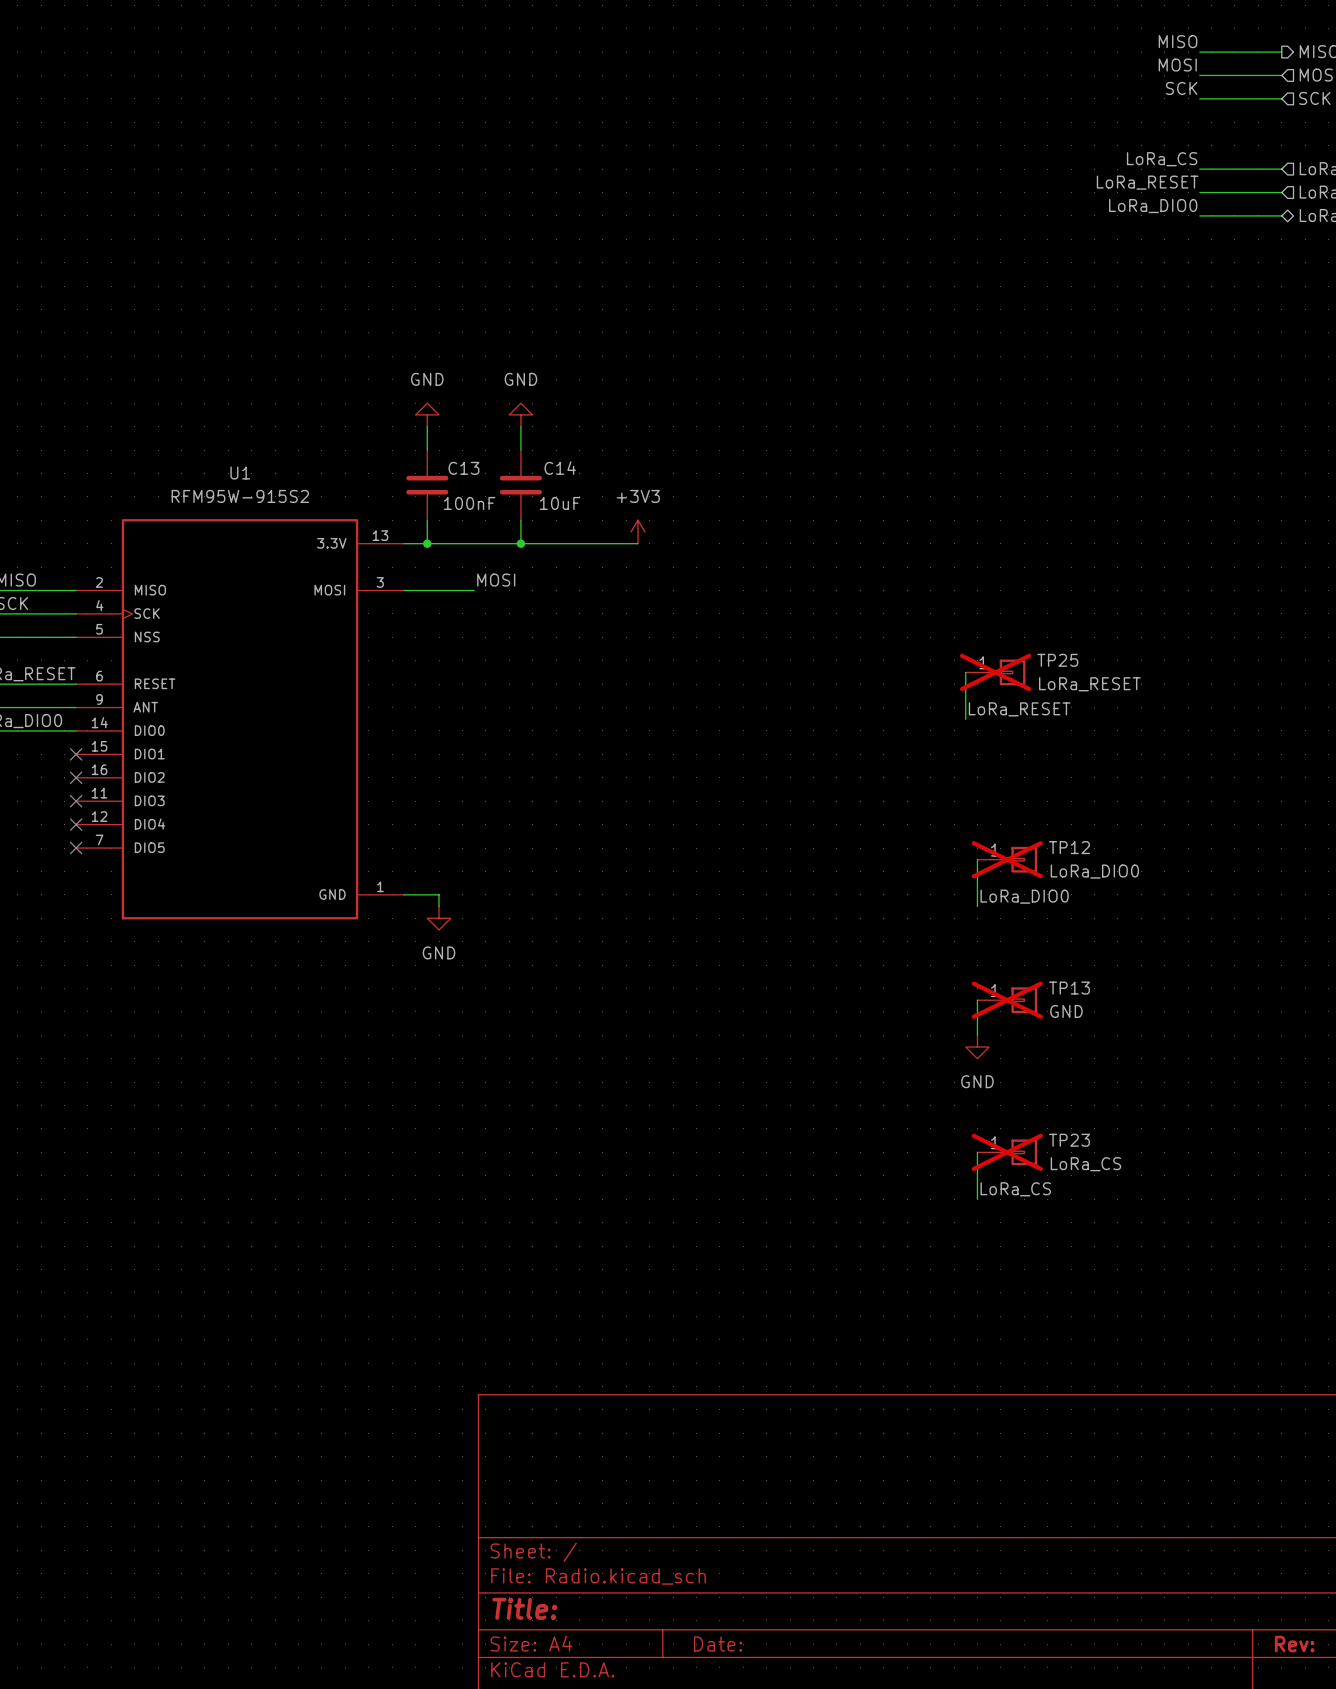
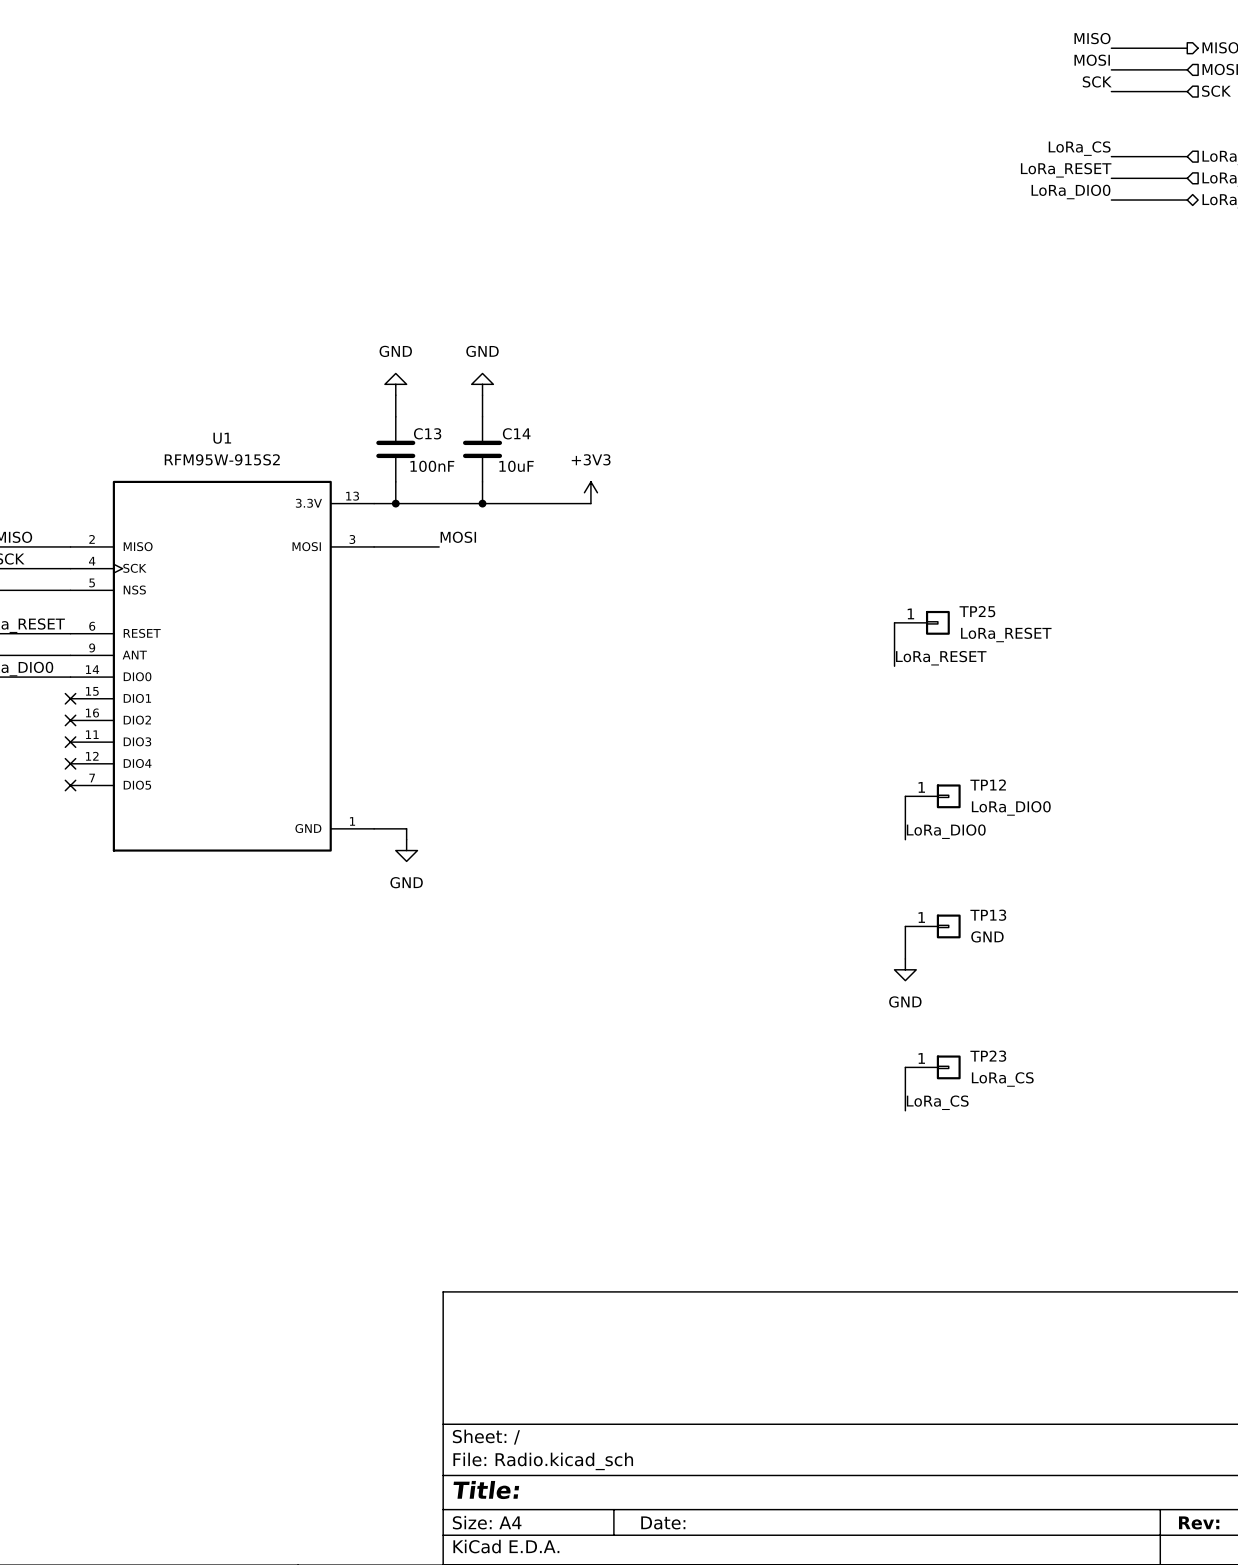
TP25 do-not-place cross: (995, 672) -> none
TP12 do-not-place cross: (1007, 859) -> none
TP13 do-not-place cross: (1007, 1000) -> none
TP23 do-not-place cross: (1007, 1152) -> none

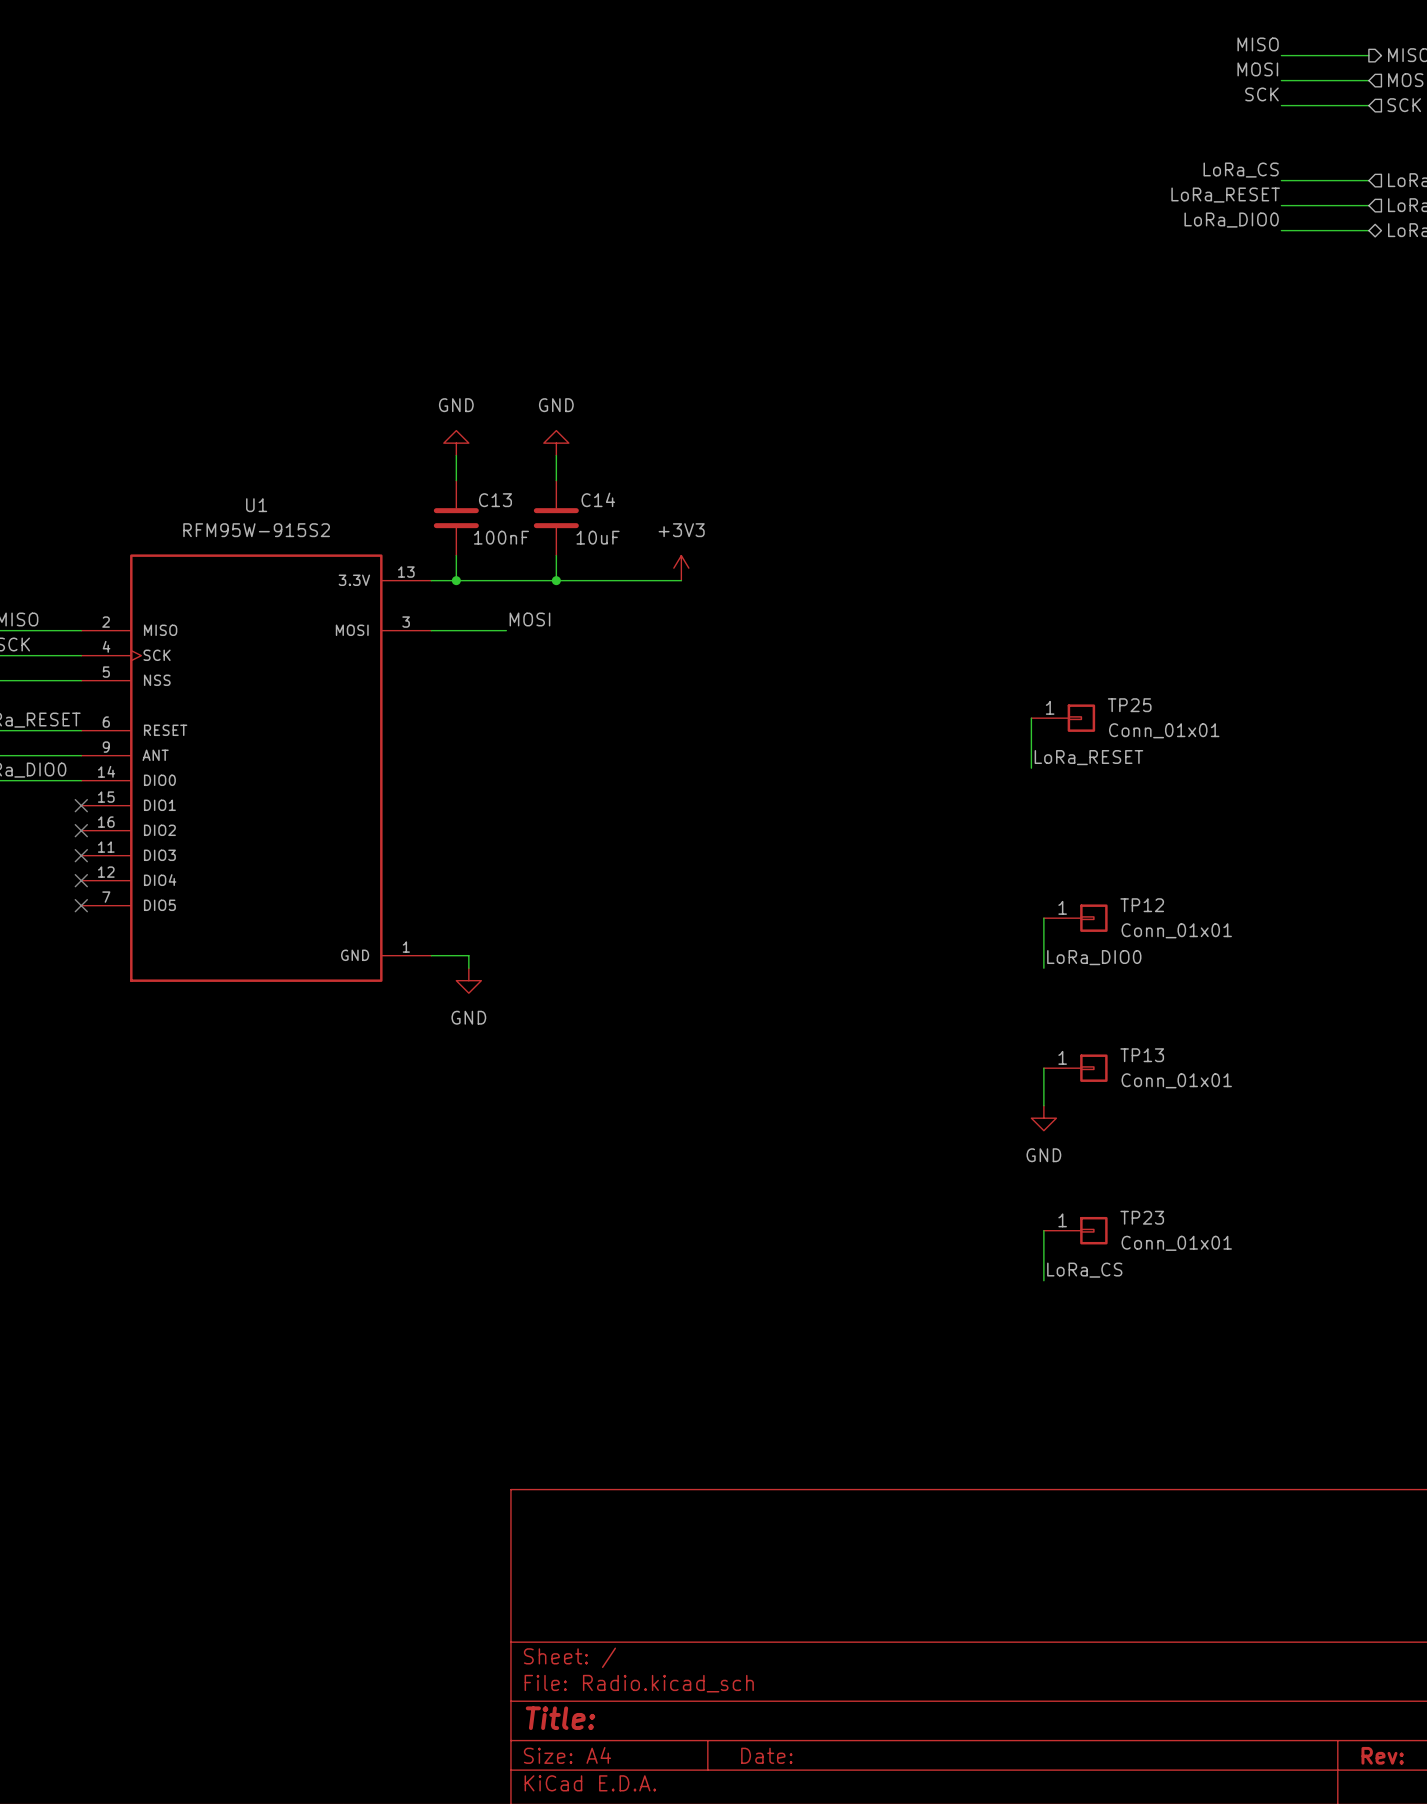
TP25 value: LoRa_RESET (1006, 634) -> Conn_01x01 (1164, 730)
TP12 value: LoRa_DIO0 (1011, 808) -> Conn_01x01 (1176, 930)
TP13 value: GND (987, 936) -> Conn_01x01 (1176, 1080)
TP23 value: LoRa_CS (1002, 1079) -> Conn_01x01 (1176, 1243)

